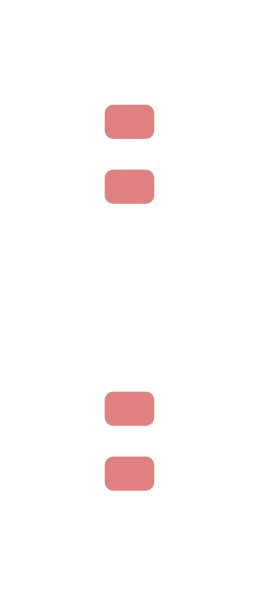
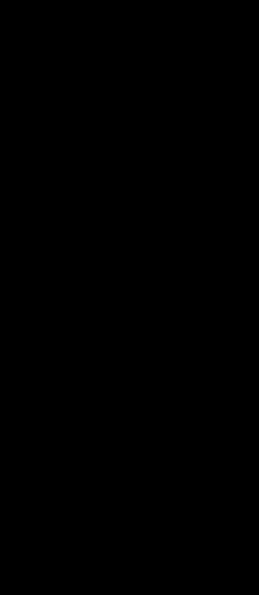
part: (129, 154) -> none
part: (129, 441) -> none

